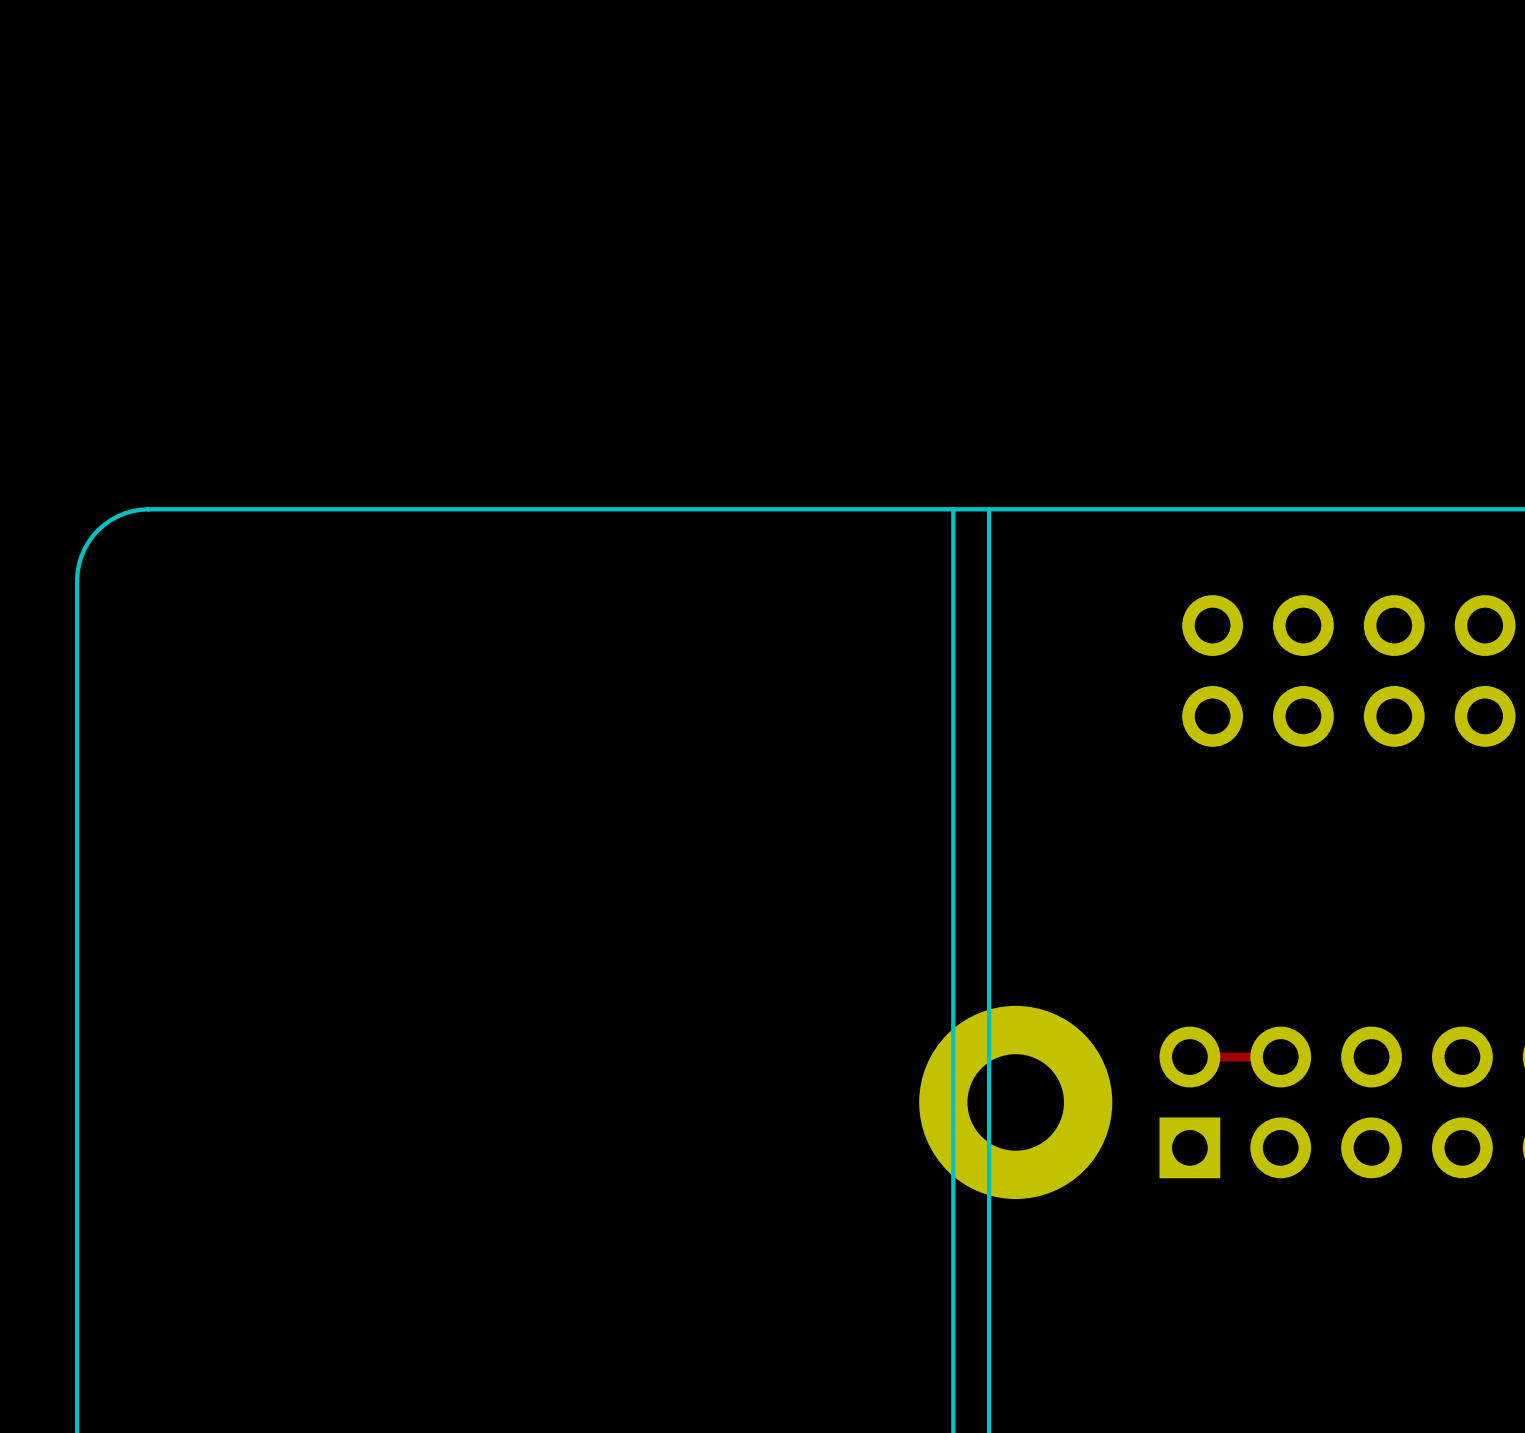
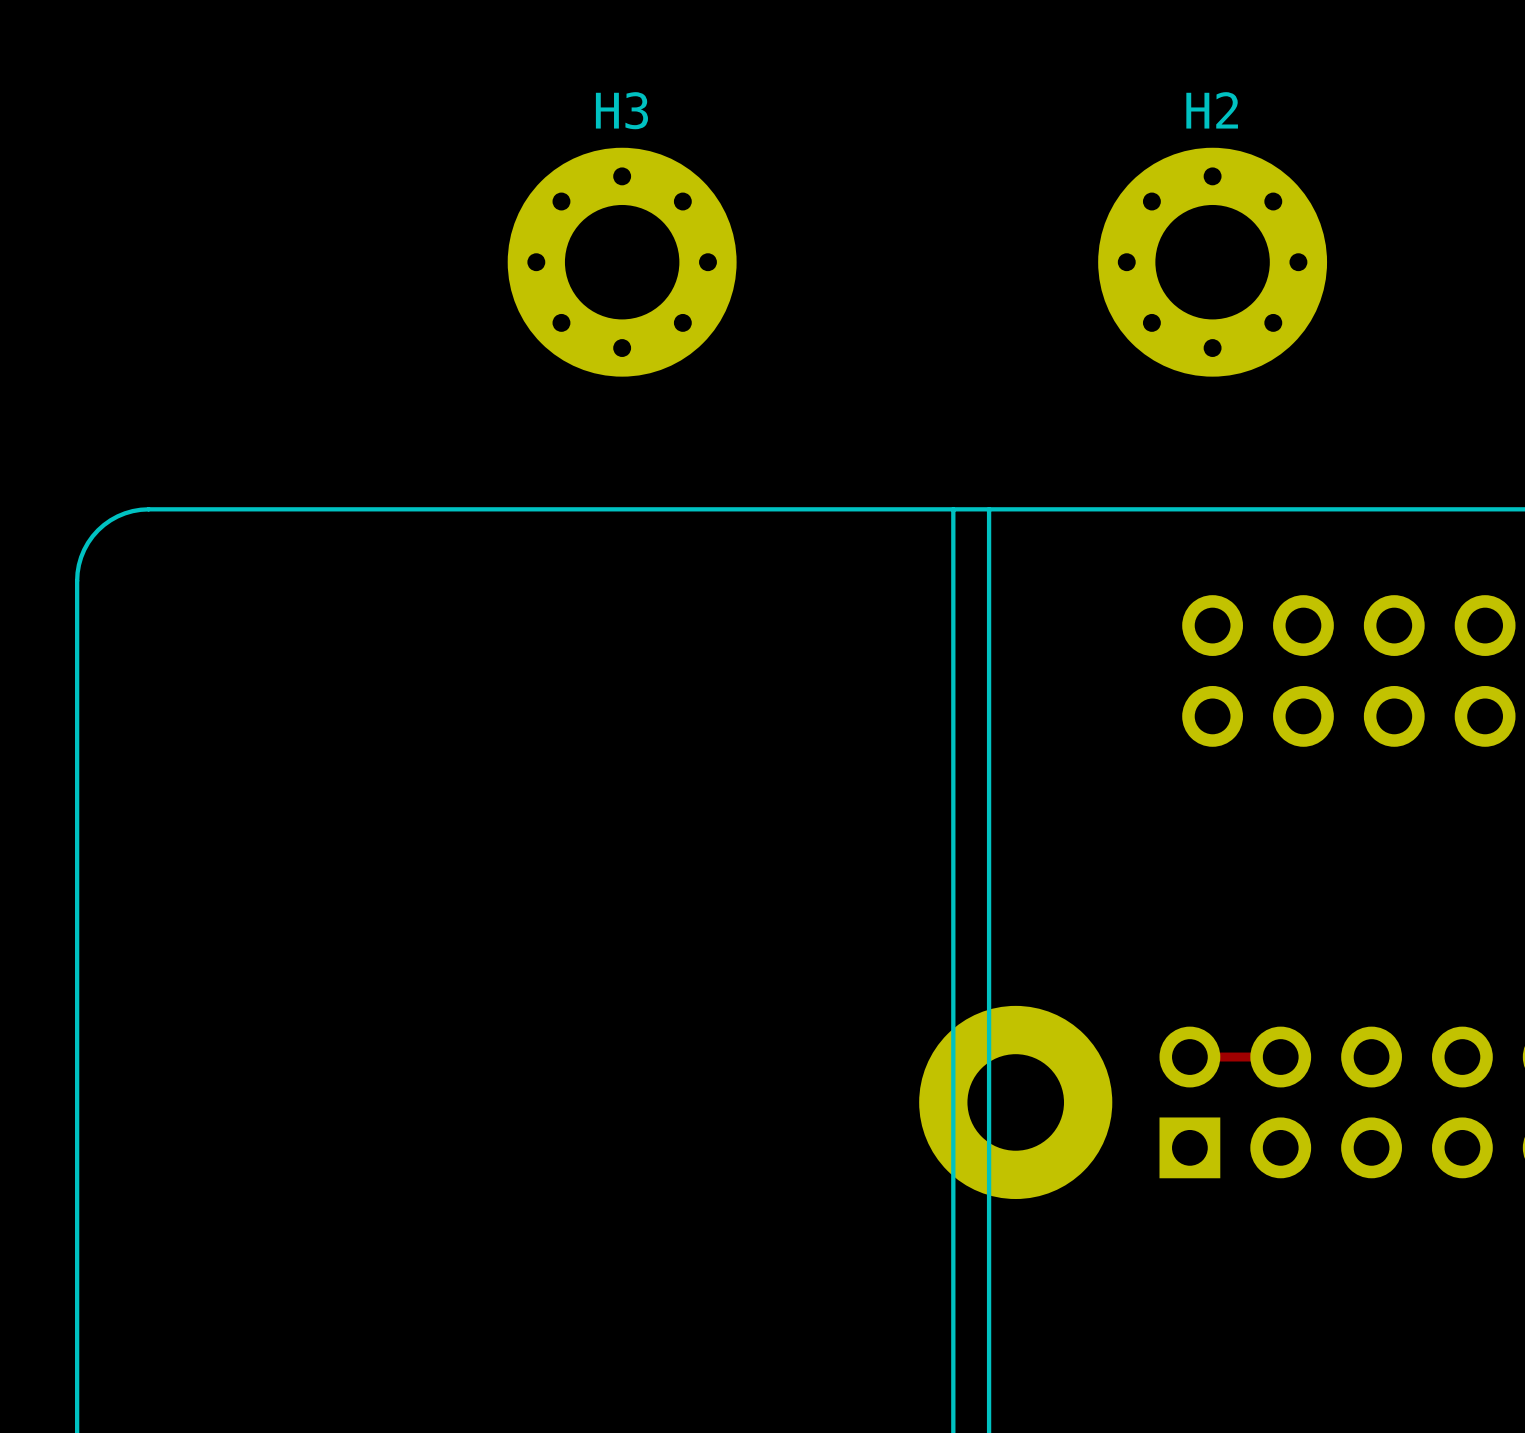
H3: none -> (622, 262)
H2: none -> (1212, 262)

